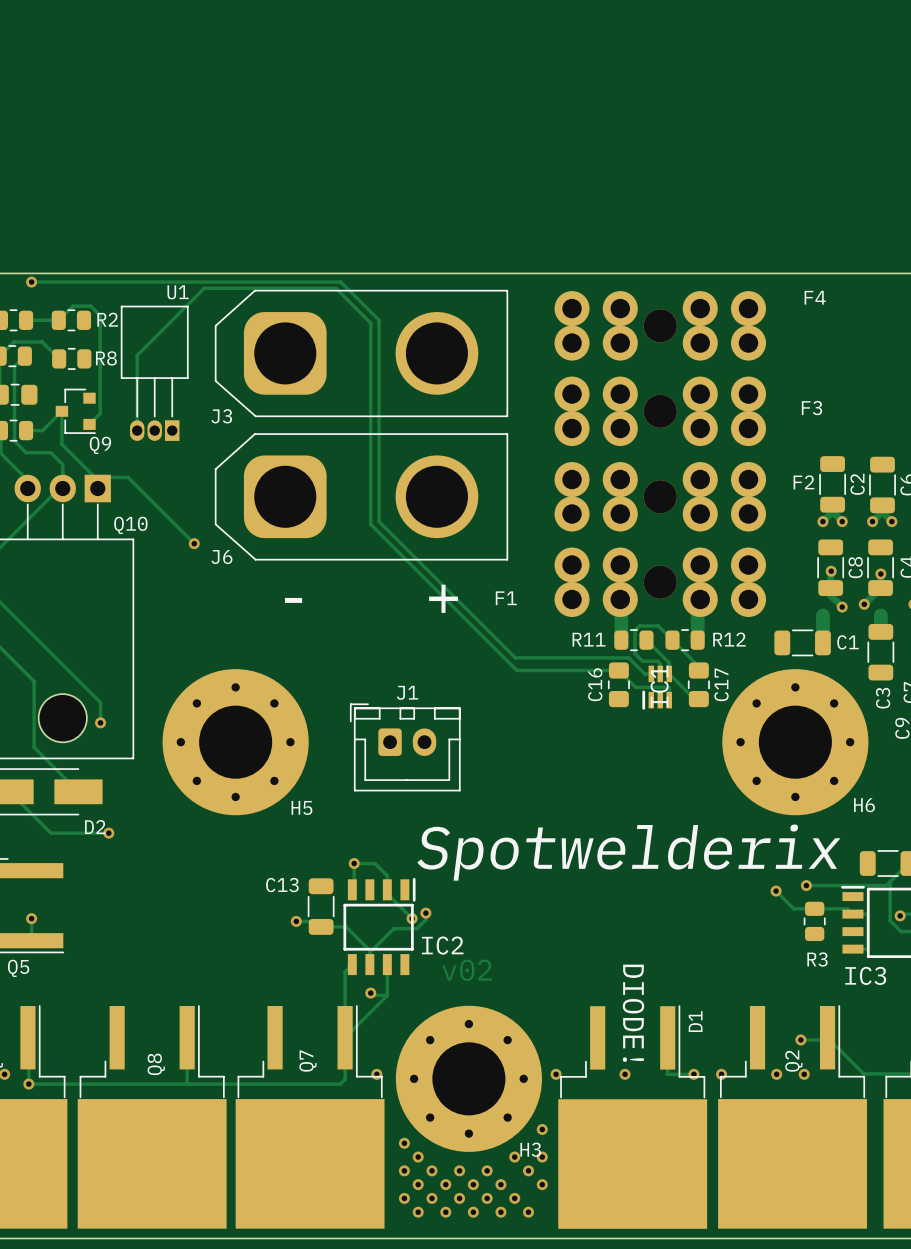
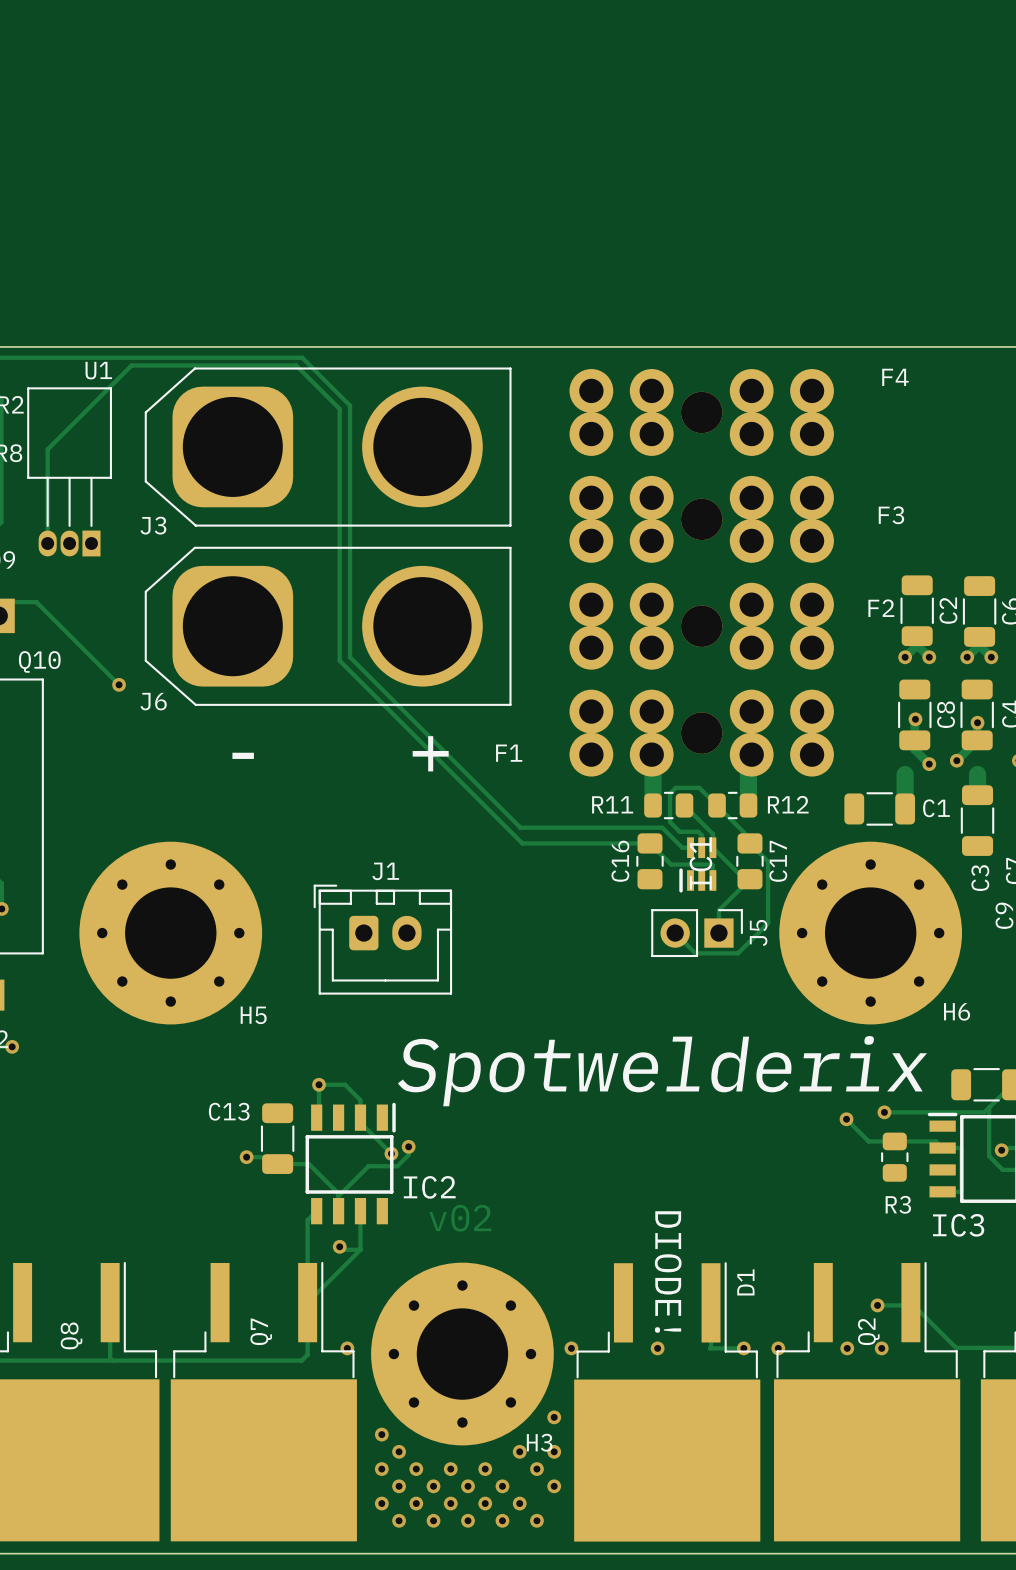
J3 footprint: [214, 289, 509, 418] -> [144, 367, 512, 527]
J6 footprint: [214, 433, 509, 561] -> [144, 546, 512, 706]
track: none -> (749, 843) (768, 861) (768, 923) (738, 953) (695, 953) (675, 933)
track: none -> (749, 879) (718, 910) (718, 933)
J5: none -> (697, 933)

